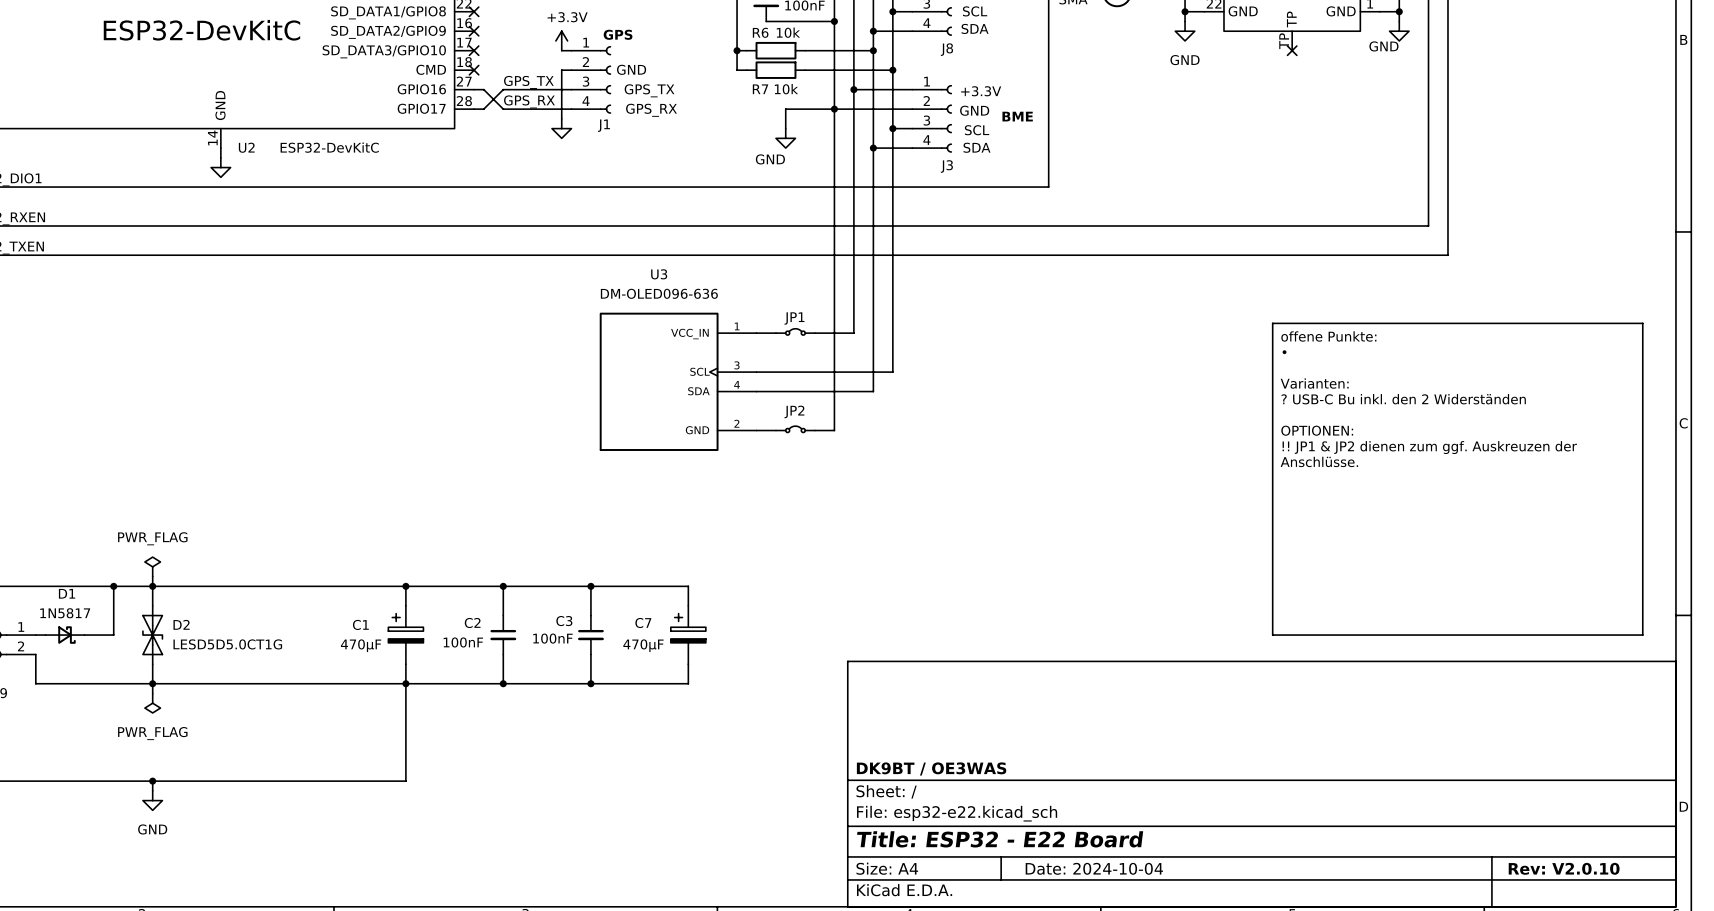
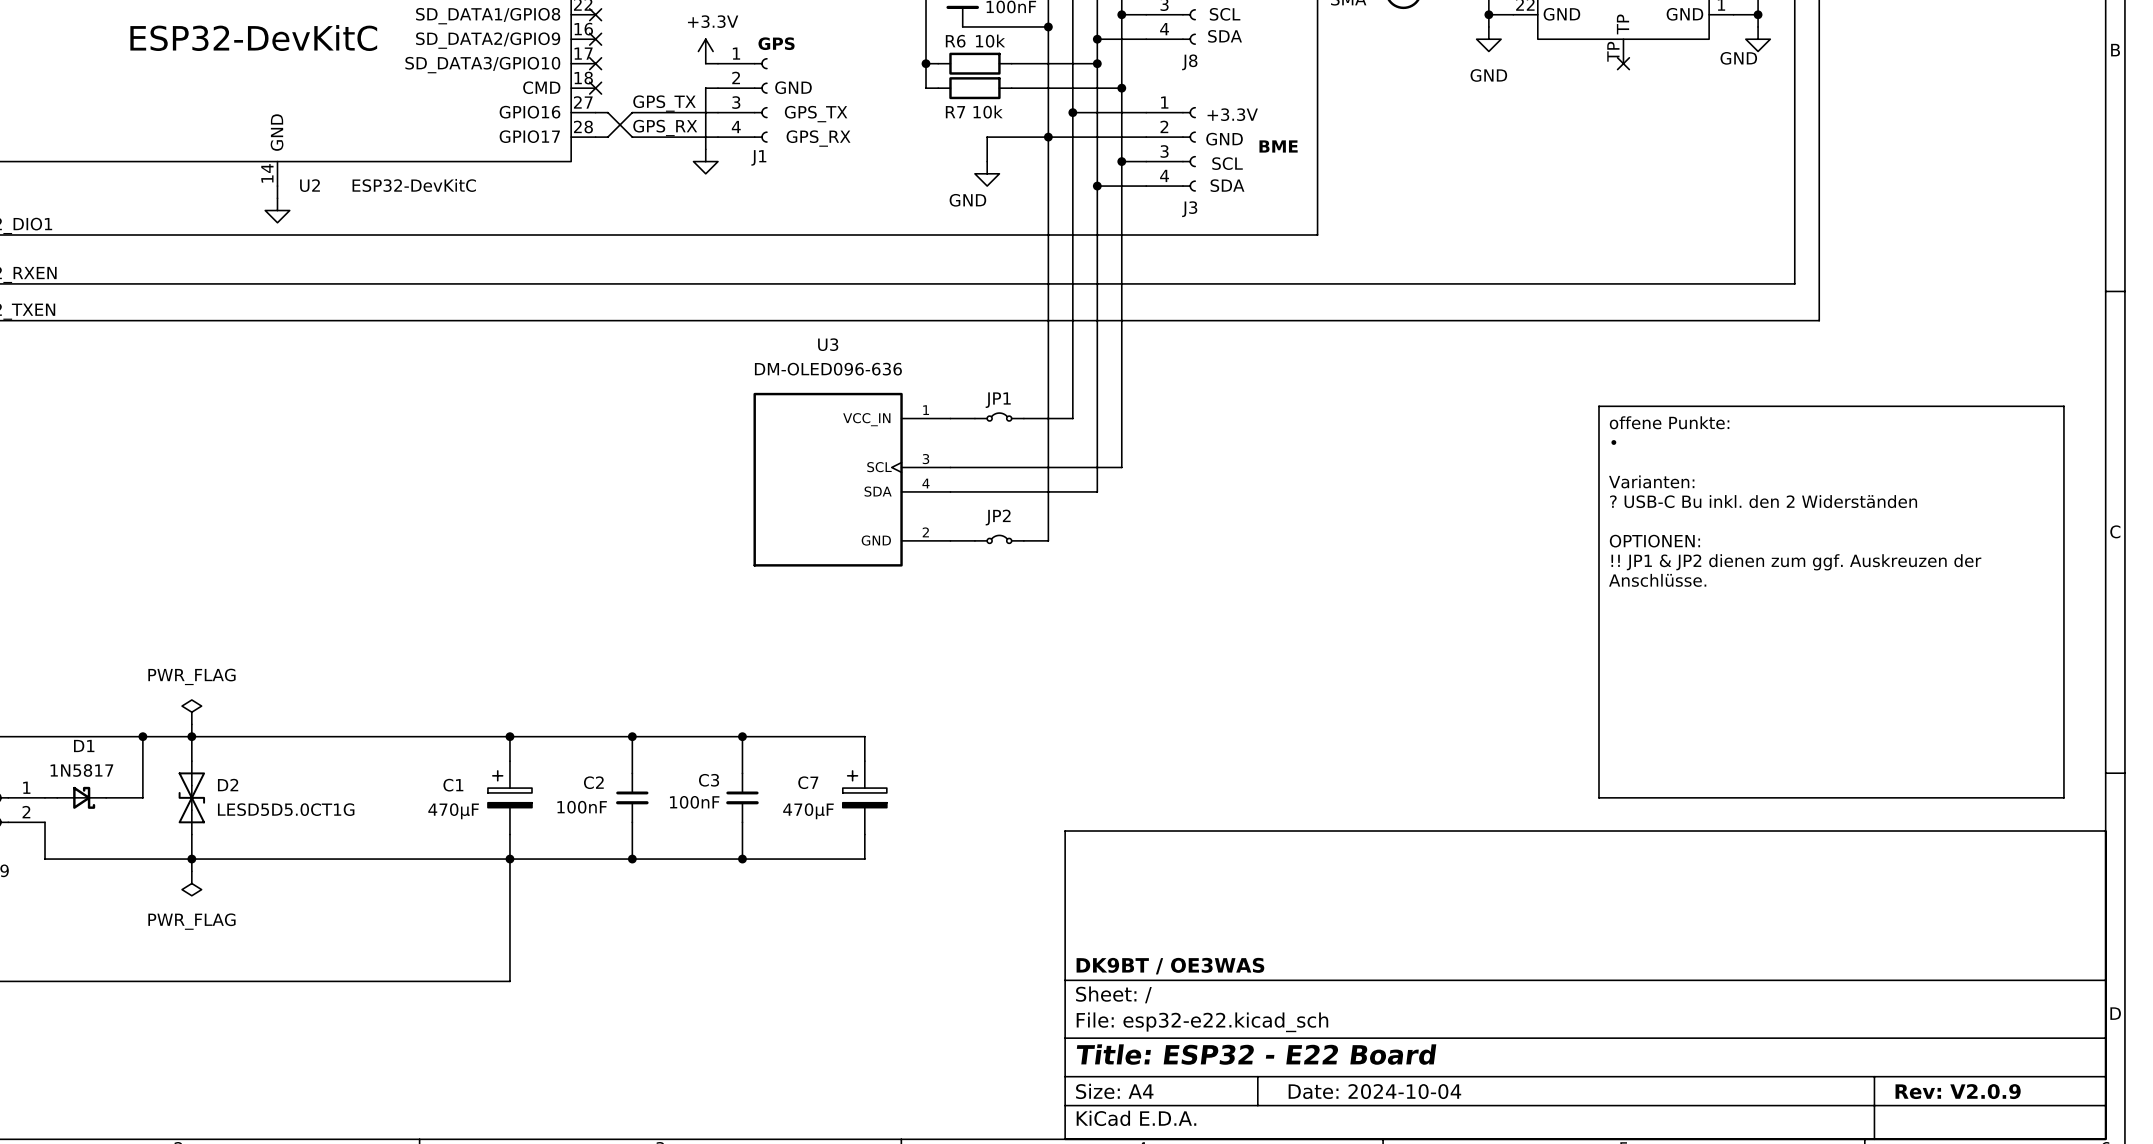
wire: (152, 781) (152, 790) -> none
junction: (152, 781) -> none
power symbol: GND (152, 800) -> none
title block: Rev: V2.0.10 (1564, 868) -> Rev: V2.0.9 (1958, 1091)

